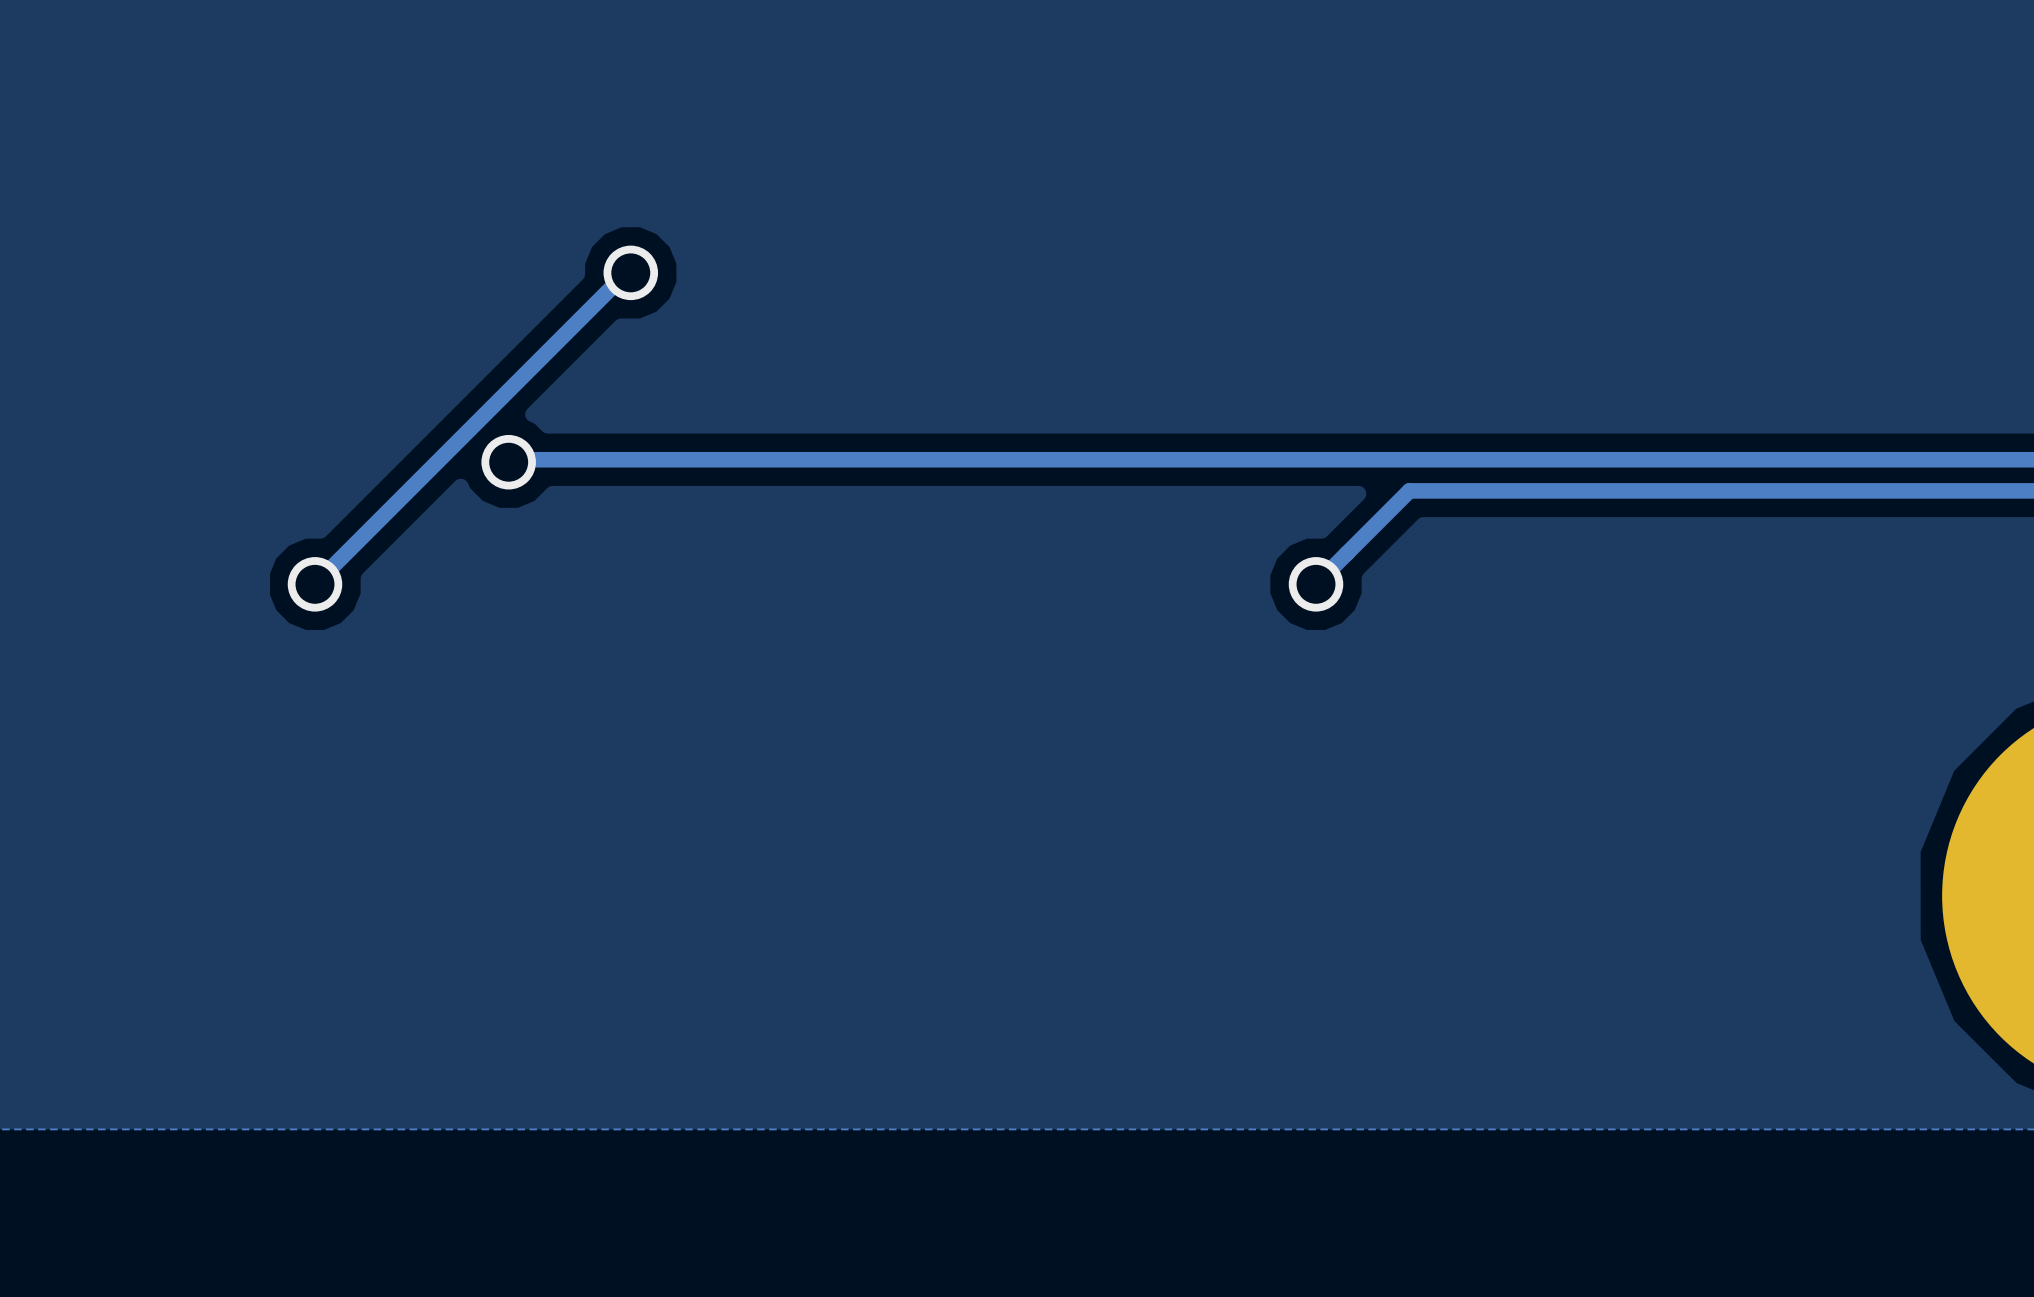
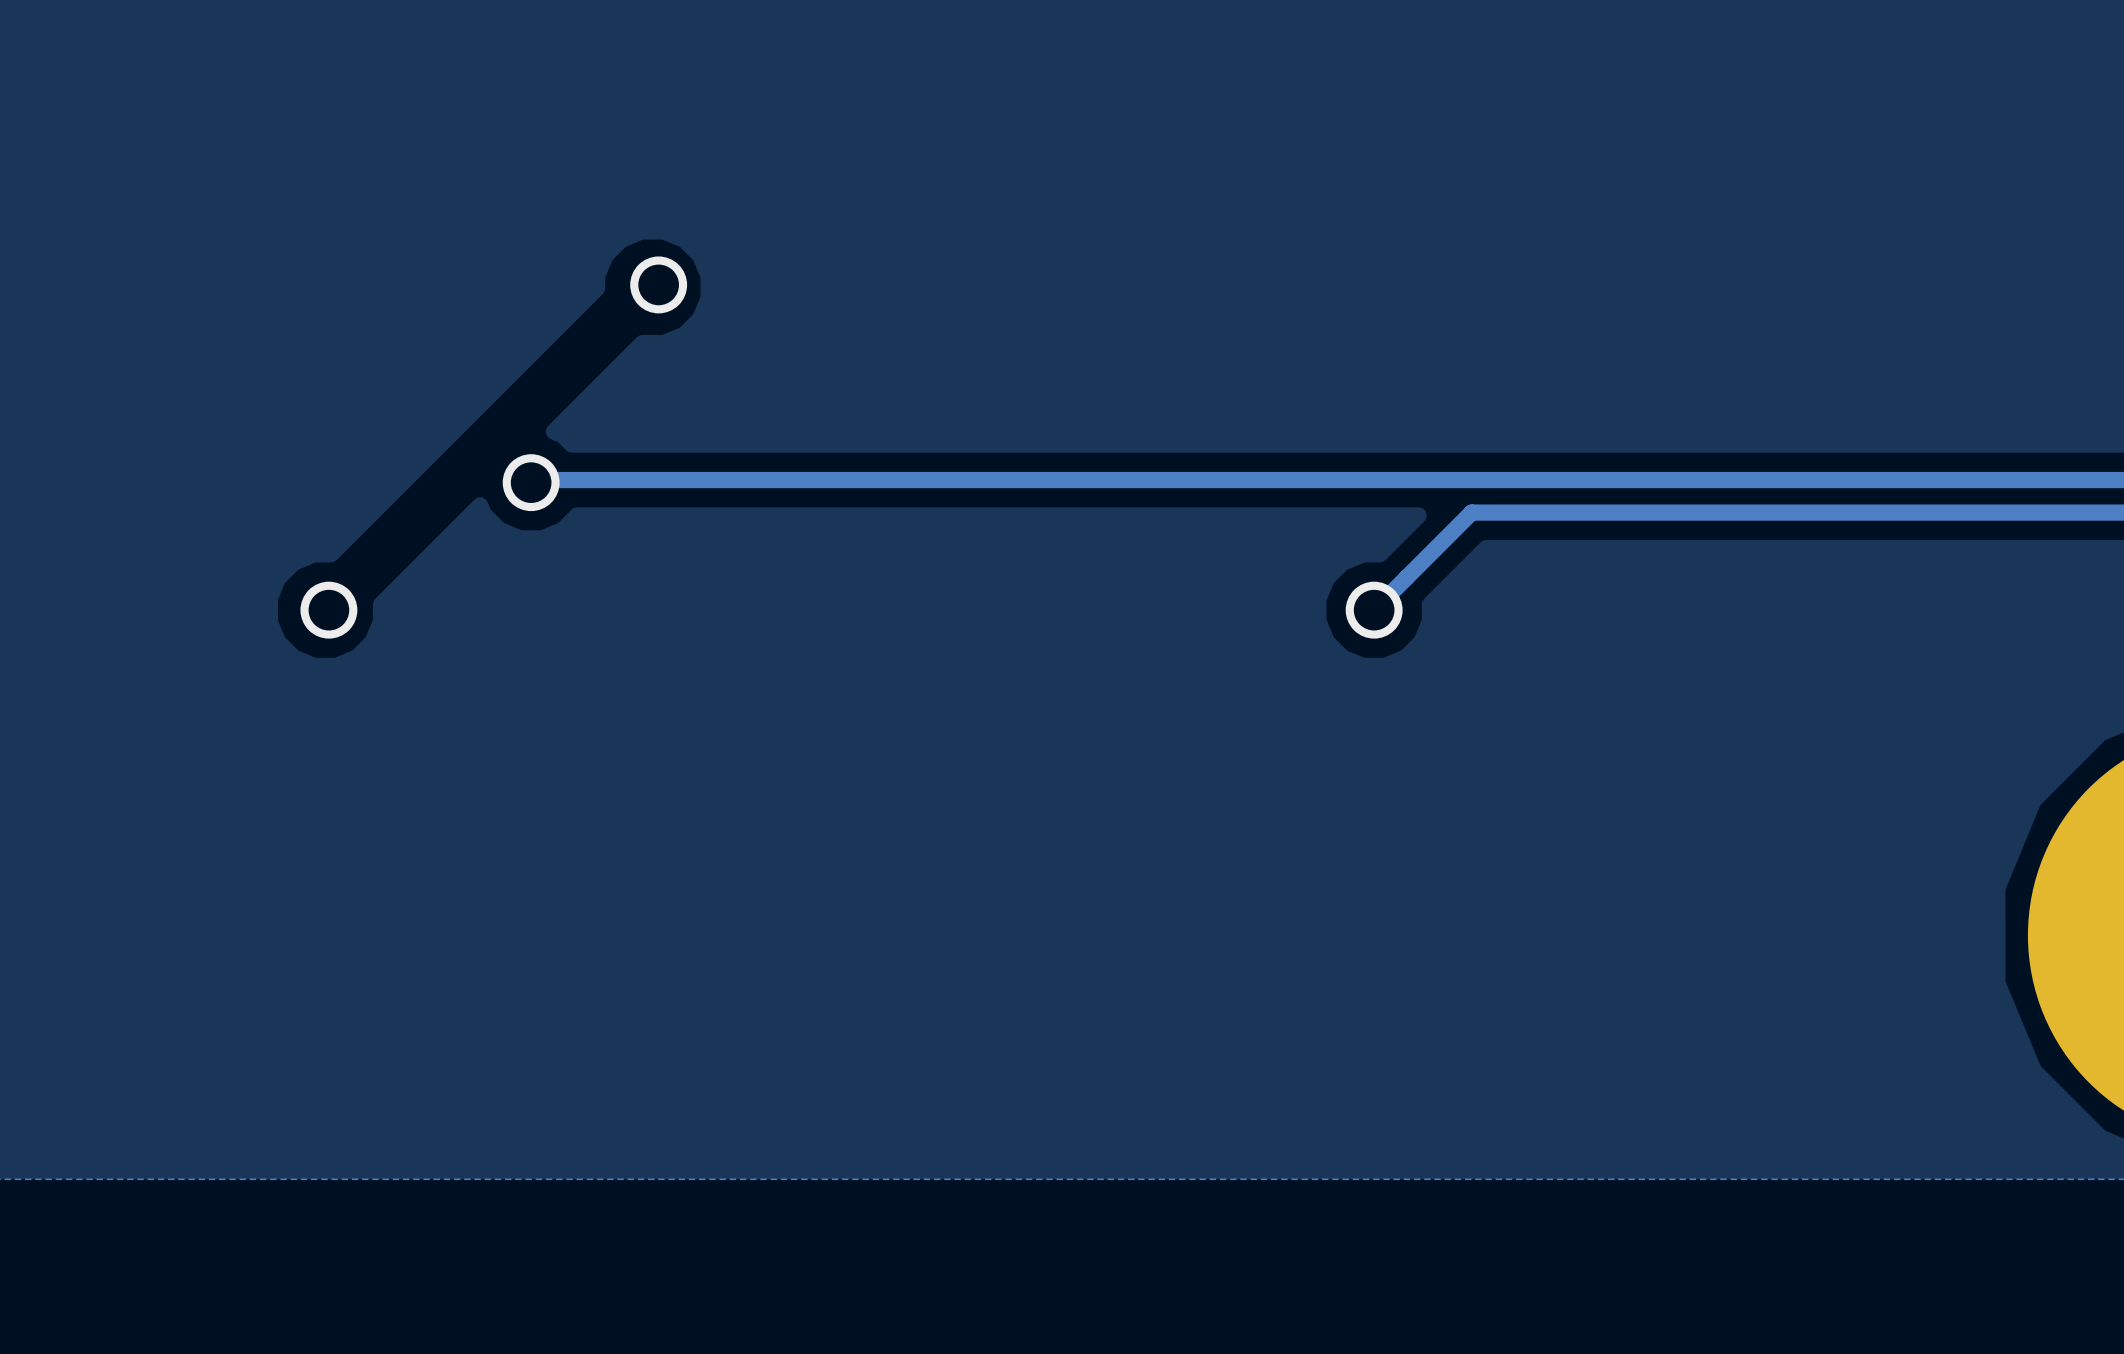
track: (630, 272) (626, 272) (315, 584) -> none

